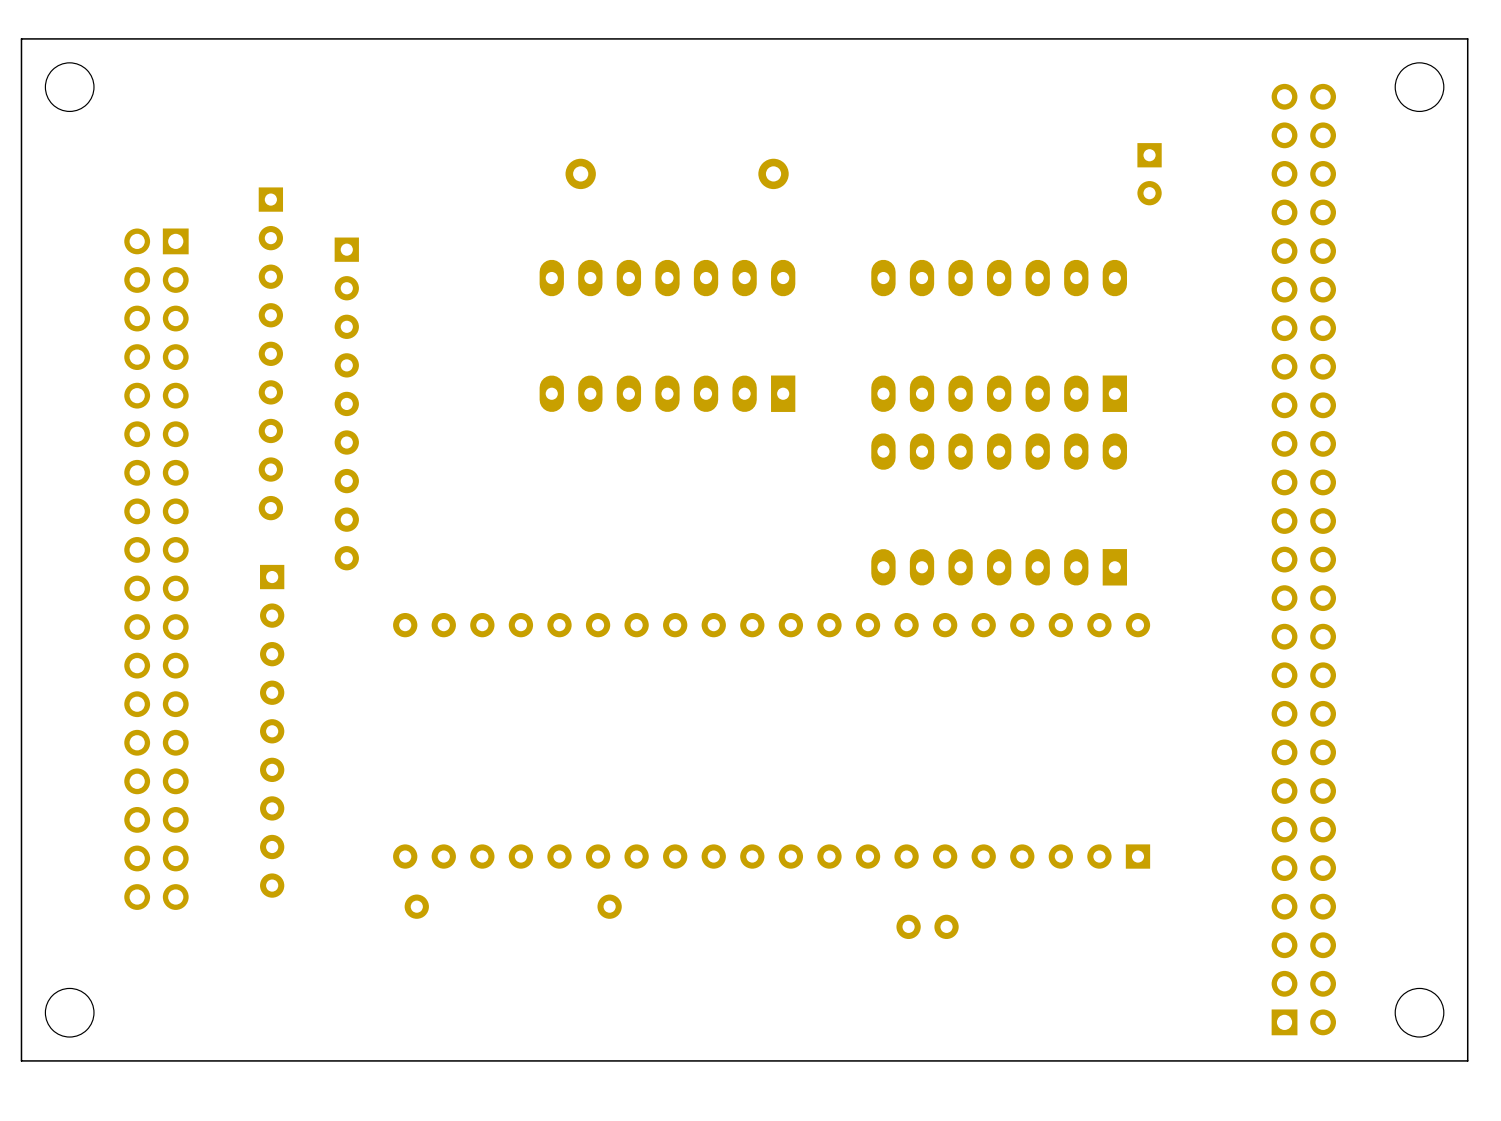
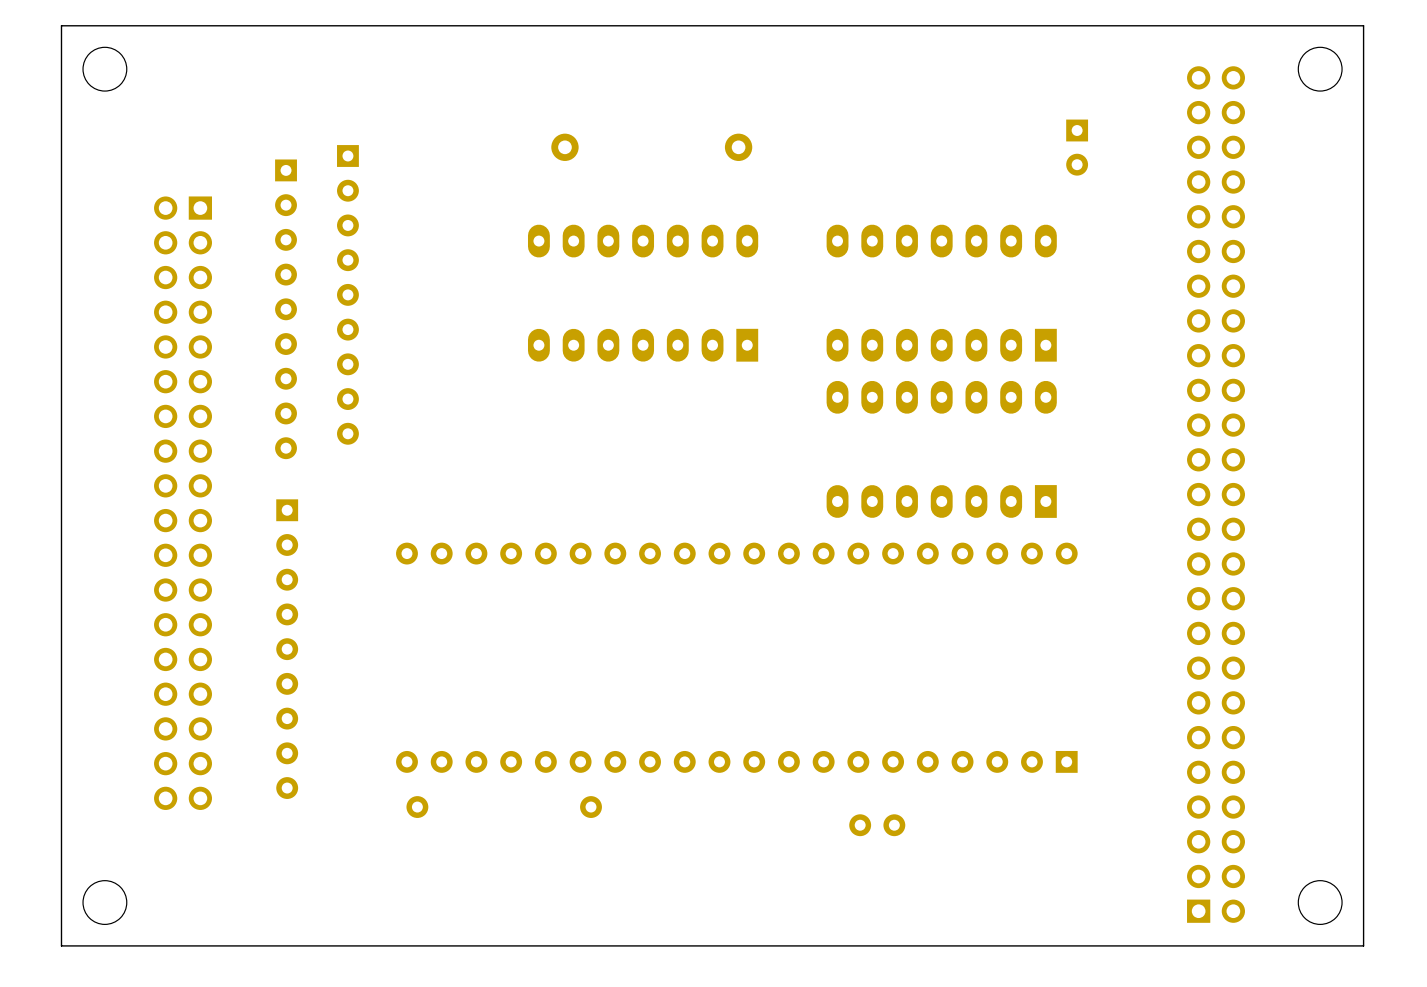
part position: (346, 403) -> (347, 294)

